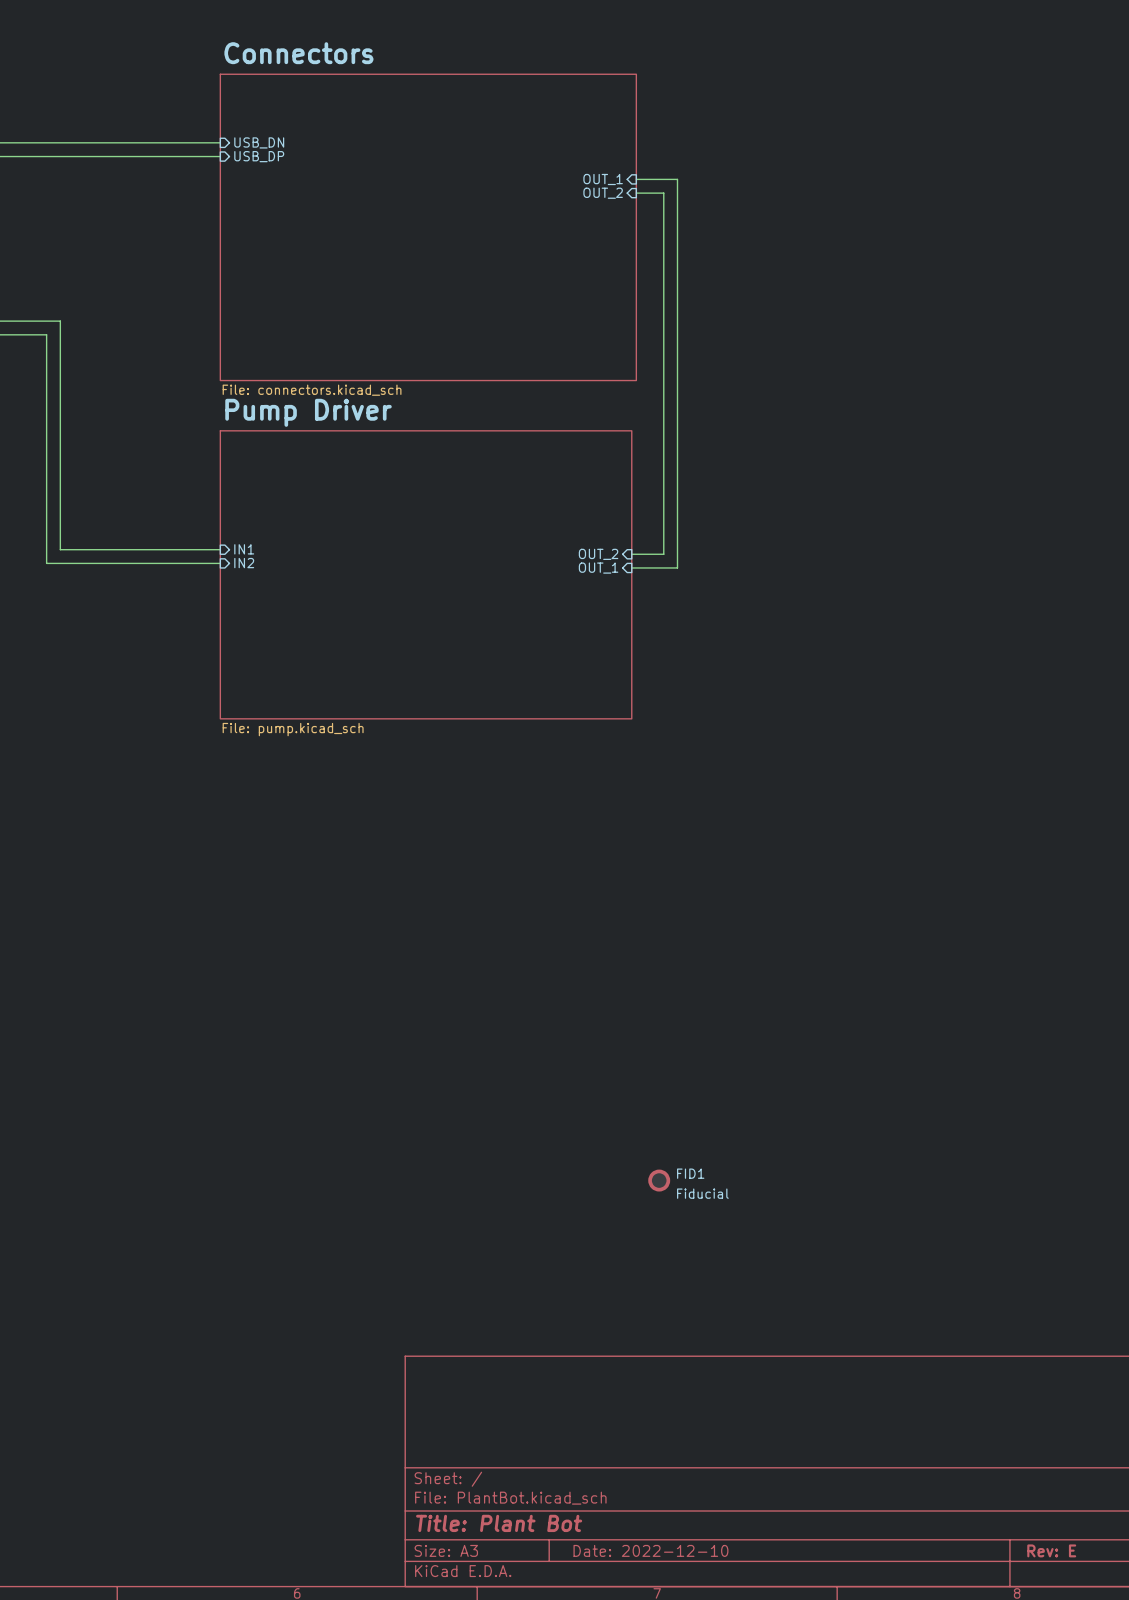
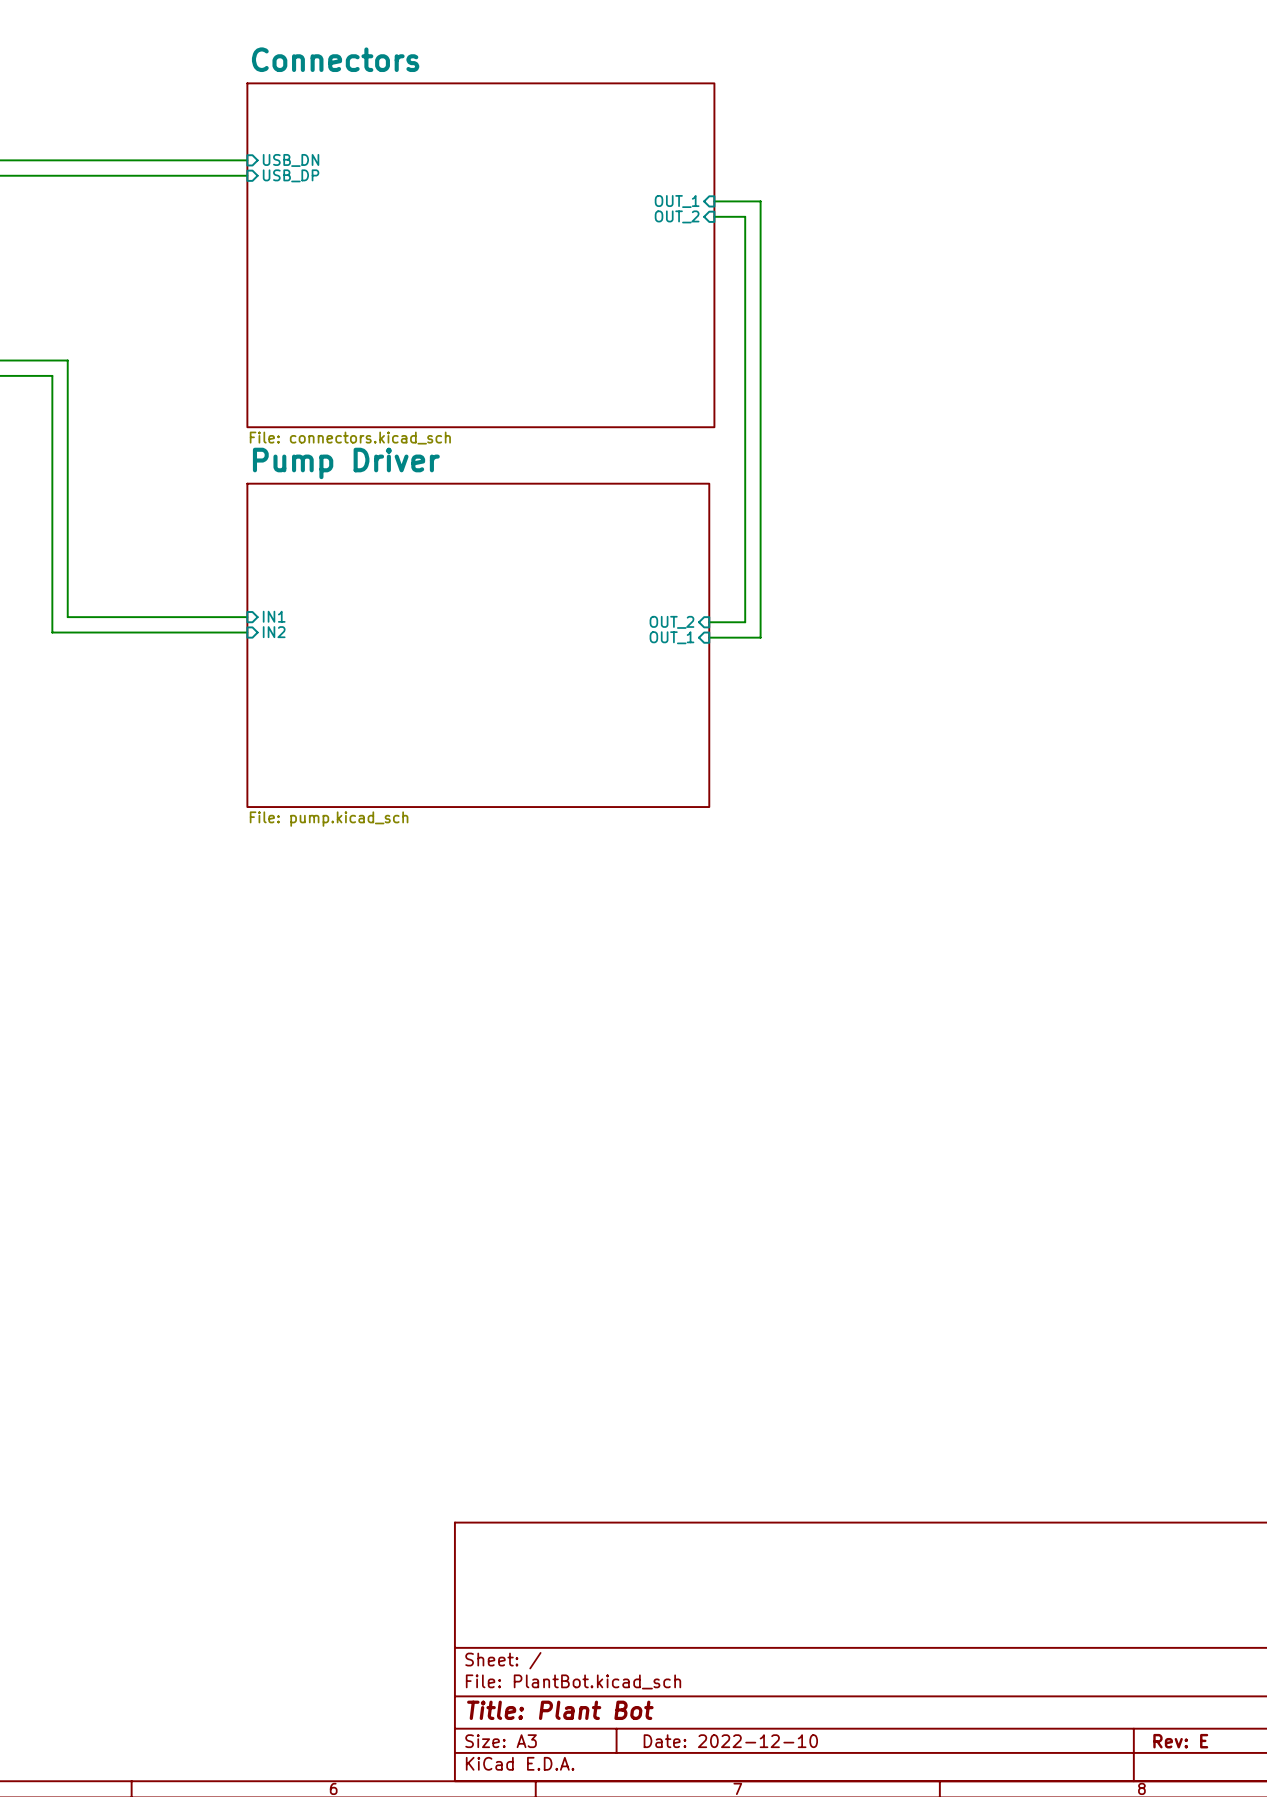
FID1: Fiducial (659, 1180) -> none

